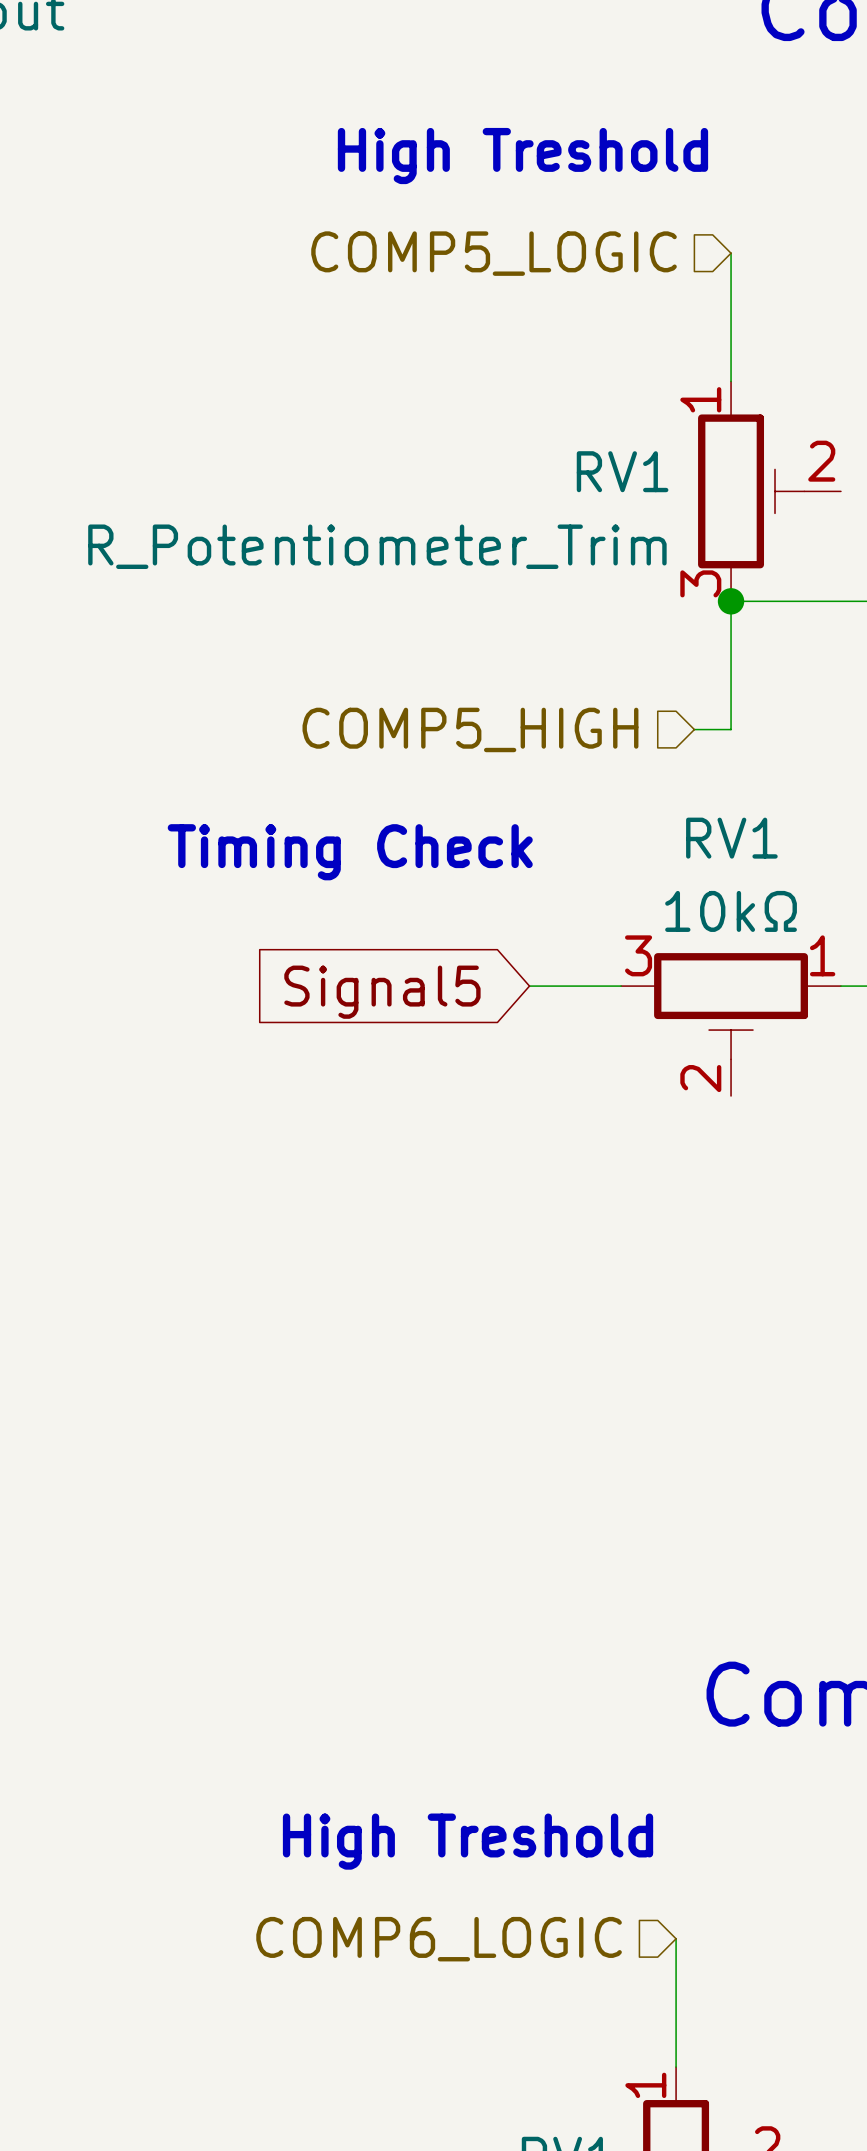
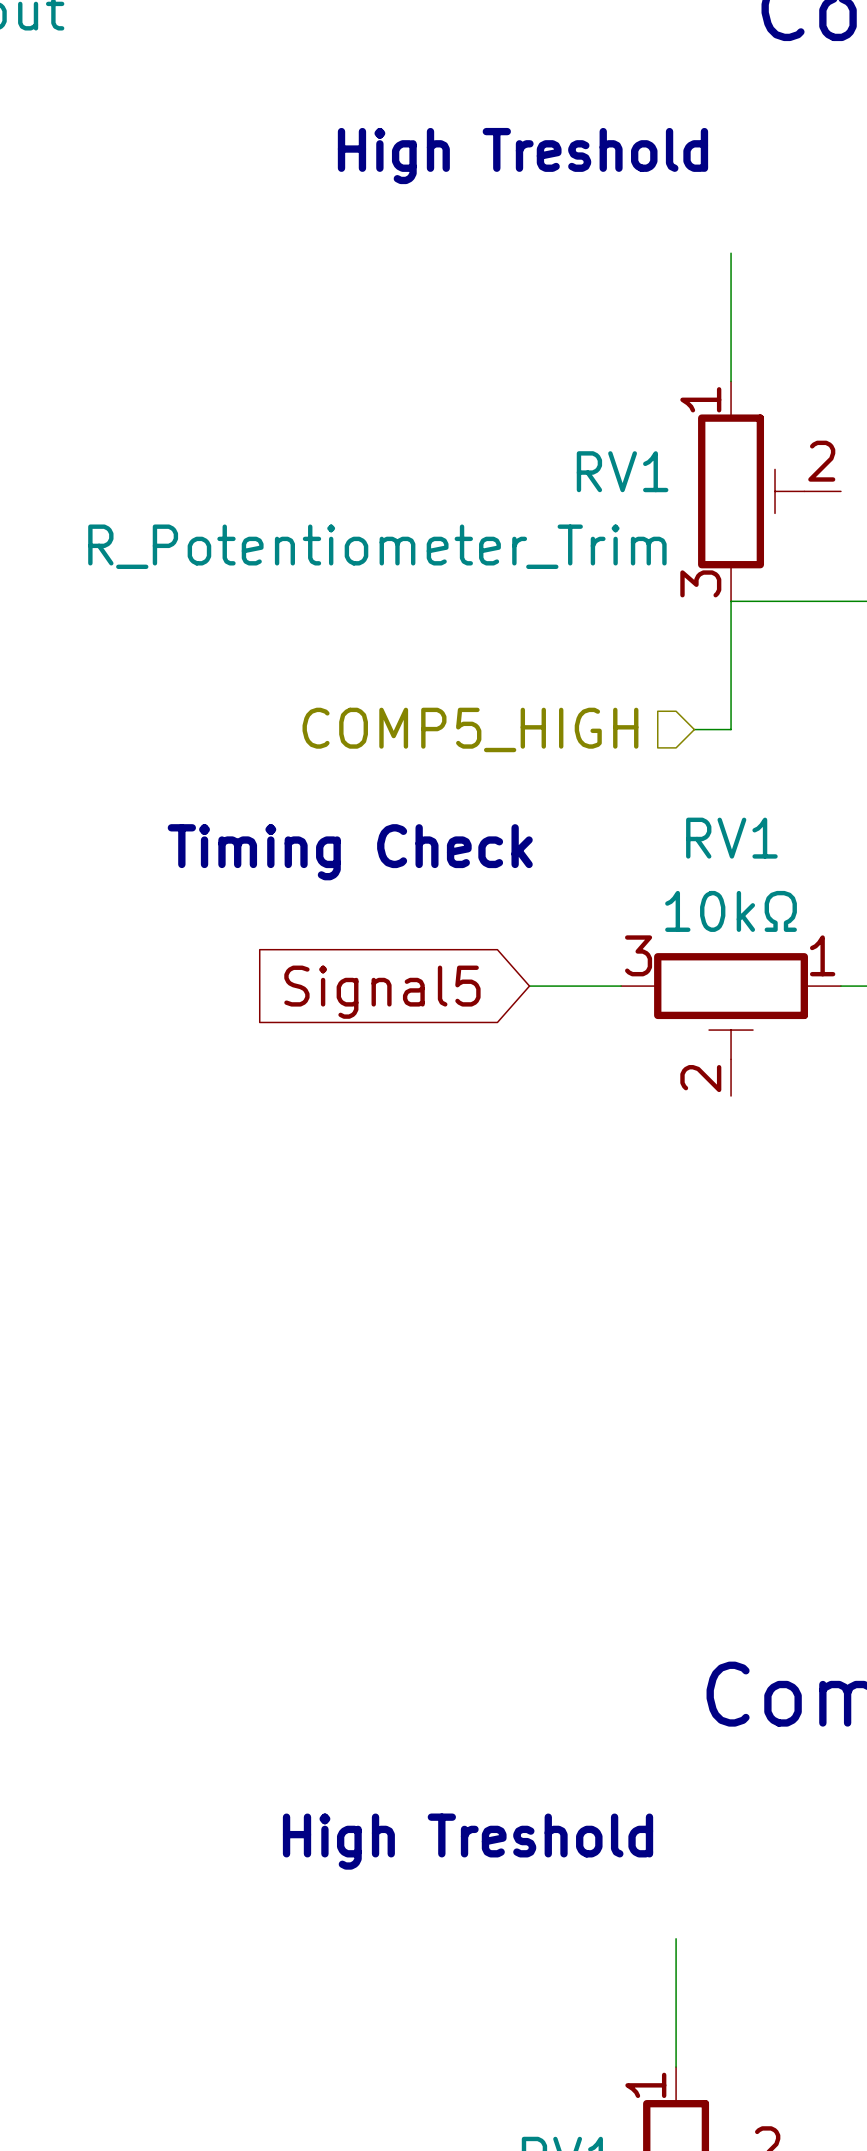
hierarchical label: COMP5_LOGIC (494, 253) -> none
junction: (731, 601) -> none
hierarchical label: COMP6_LOGIC (439, 1939) -> none

